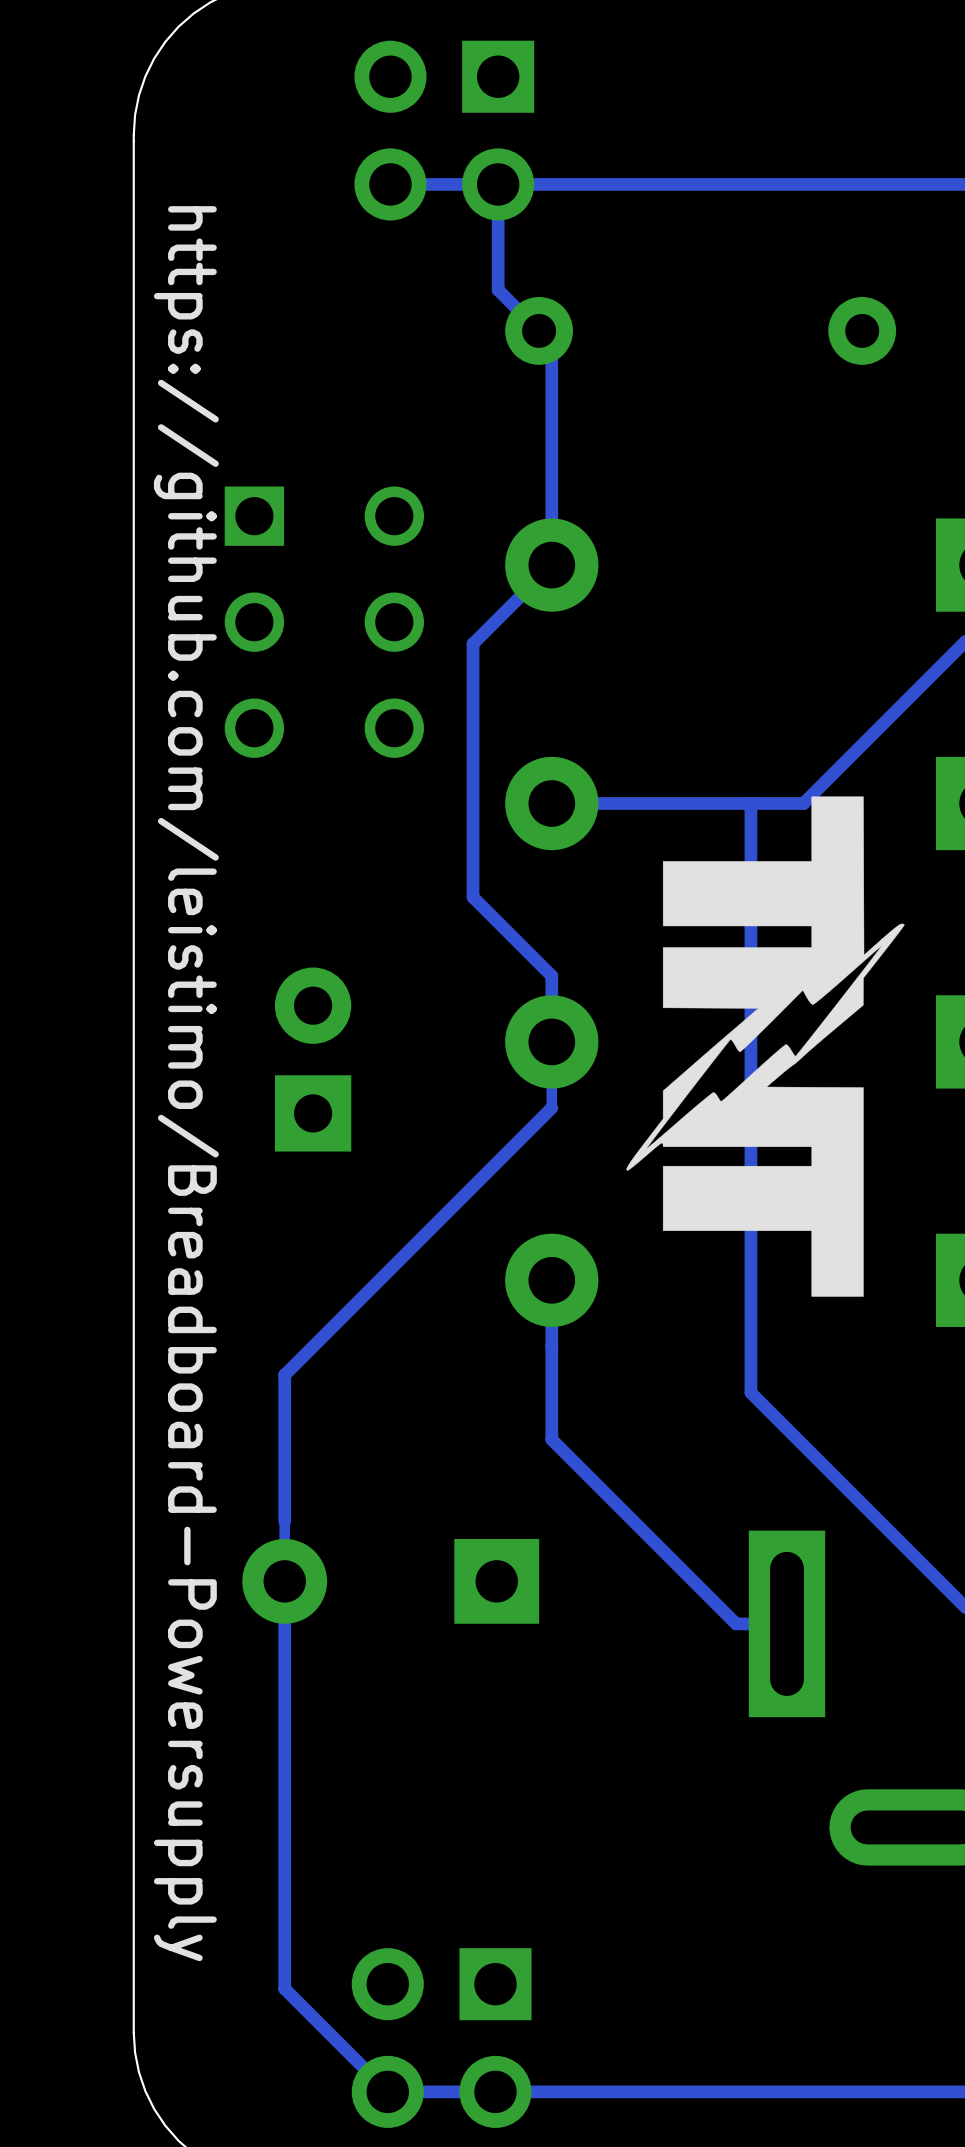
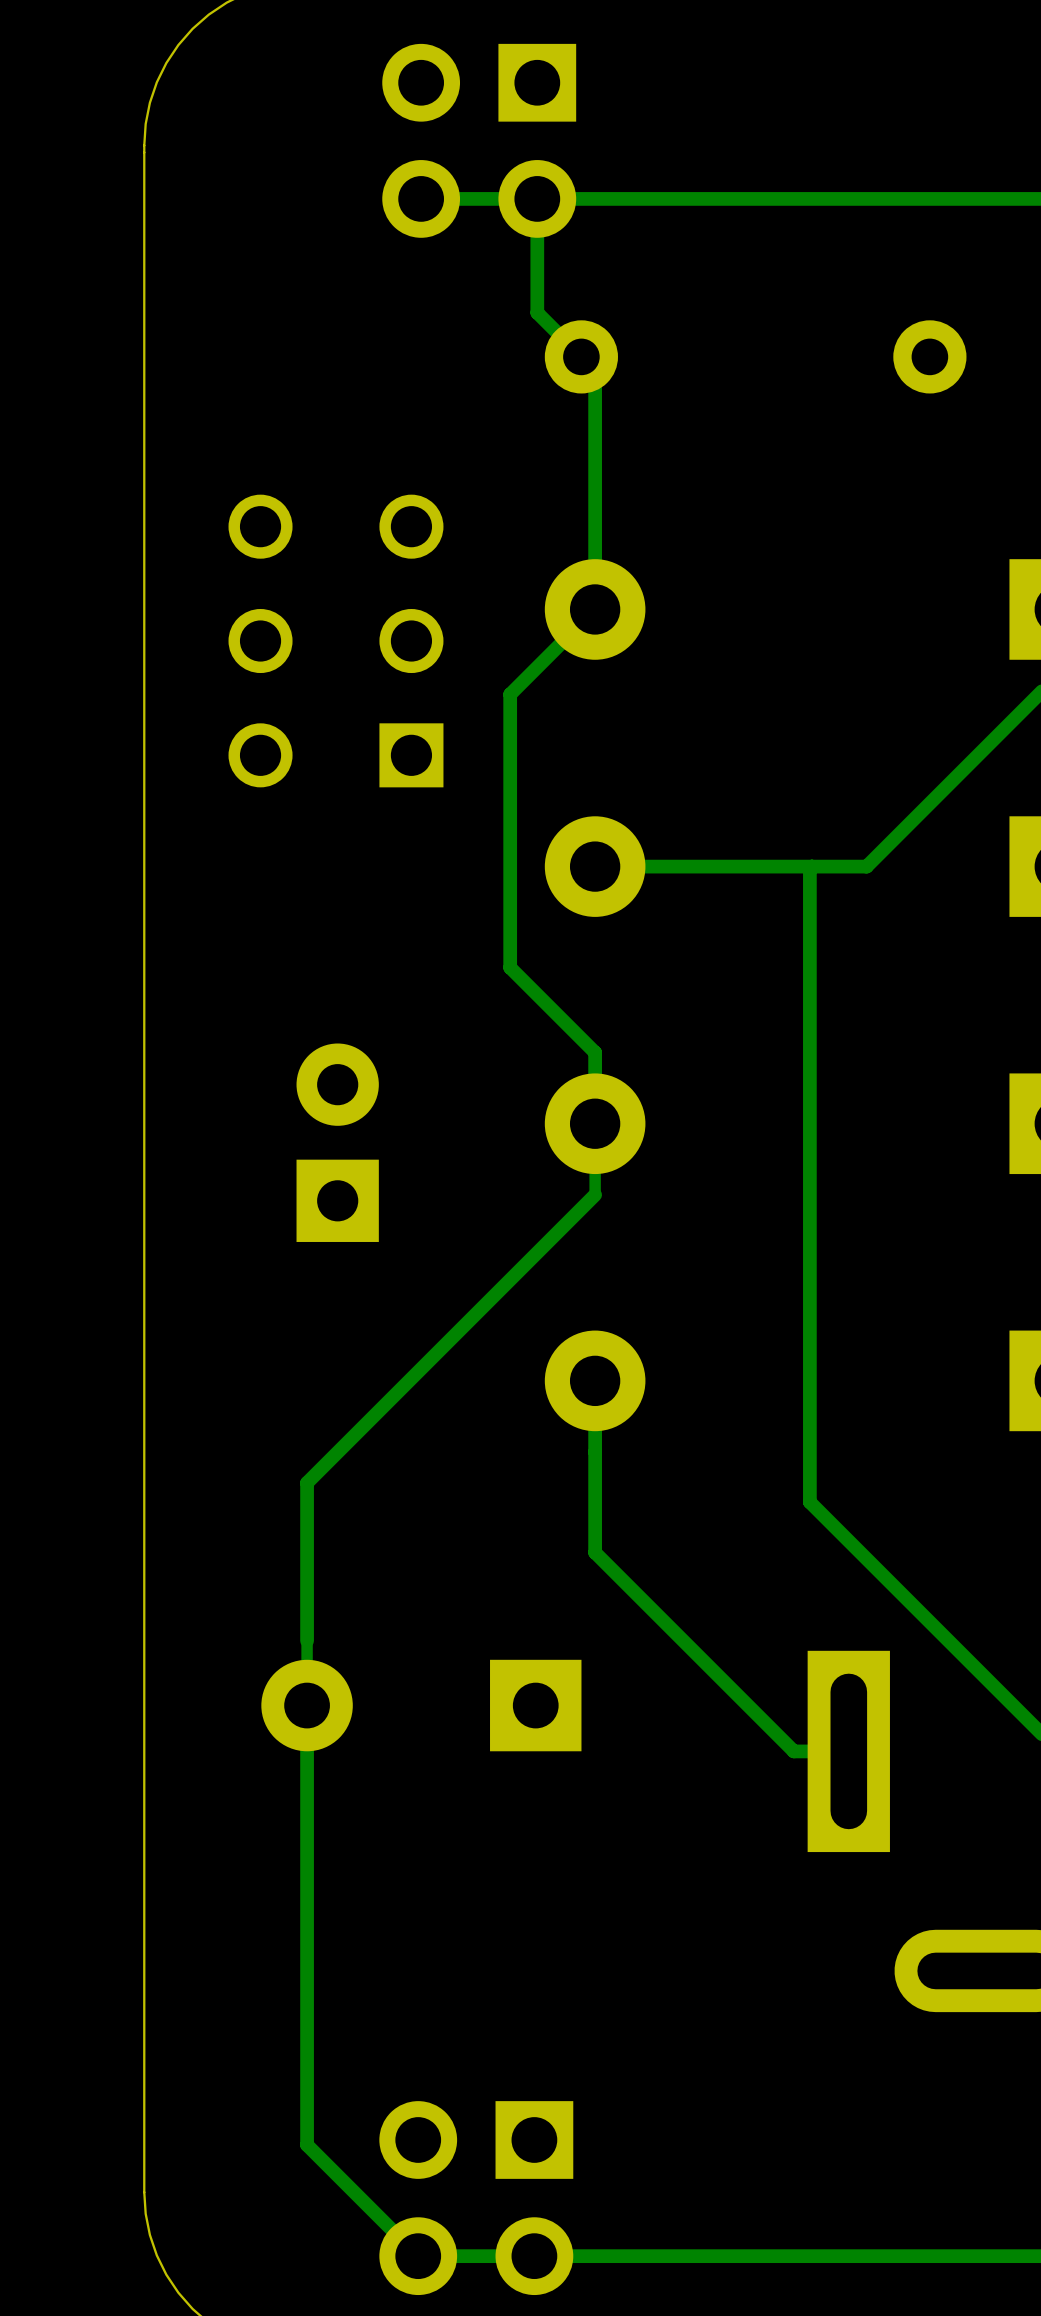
part rotation: 0° (324, 622) -> 180° (335, 641)
drawing: [626, 796, 905, 1297] -> none
text: https://github.com/leistimo/Breadboard-Powersupply (186, 1083) -> none

